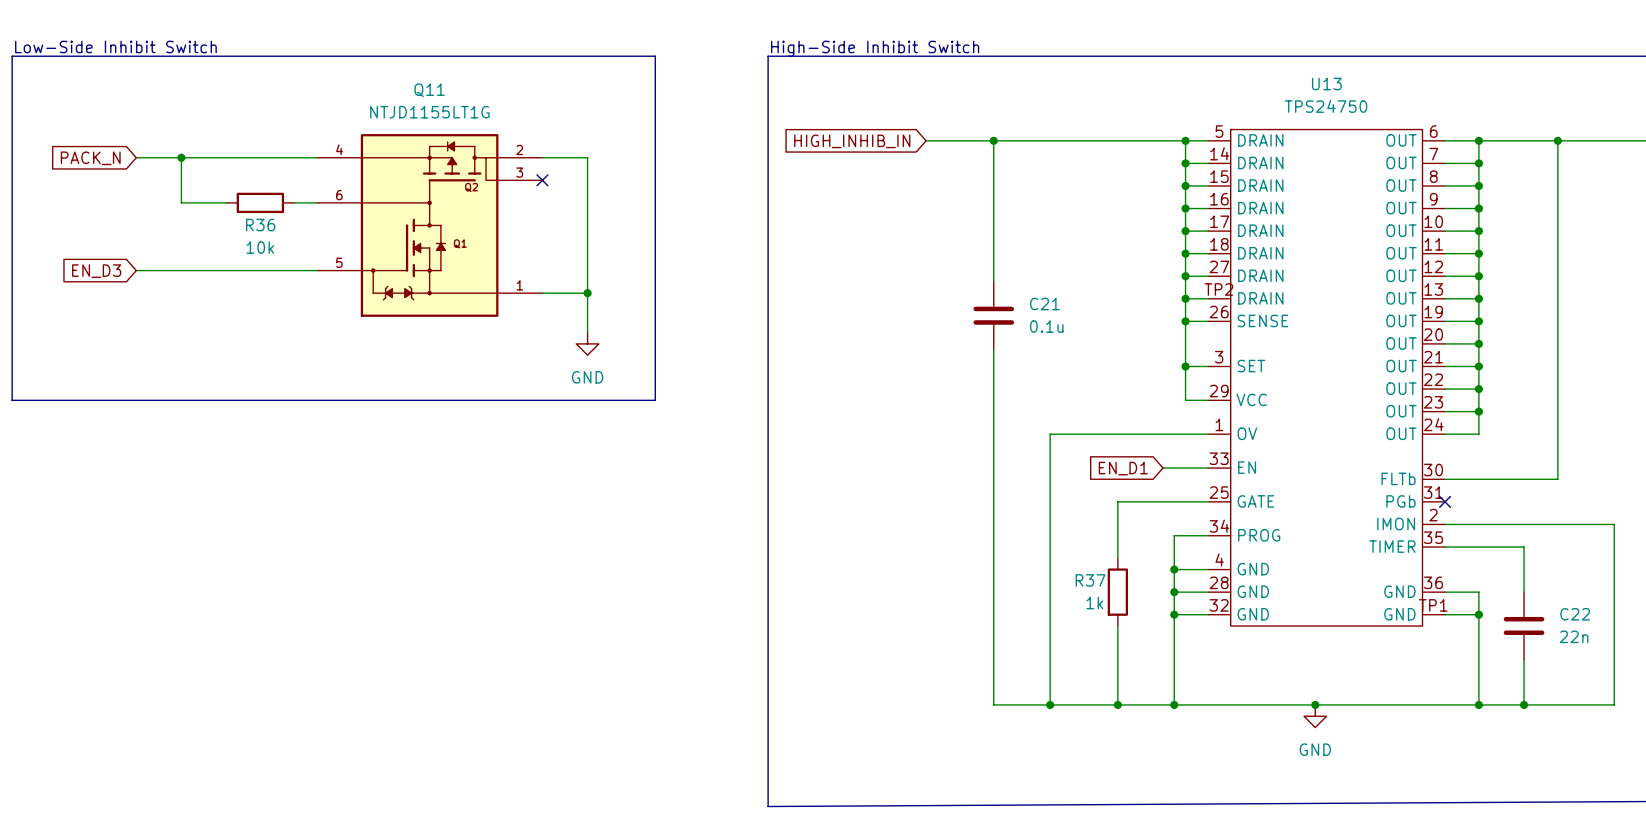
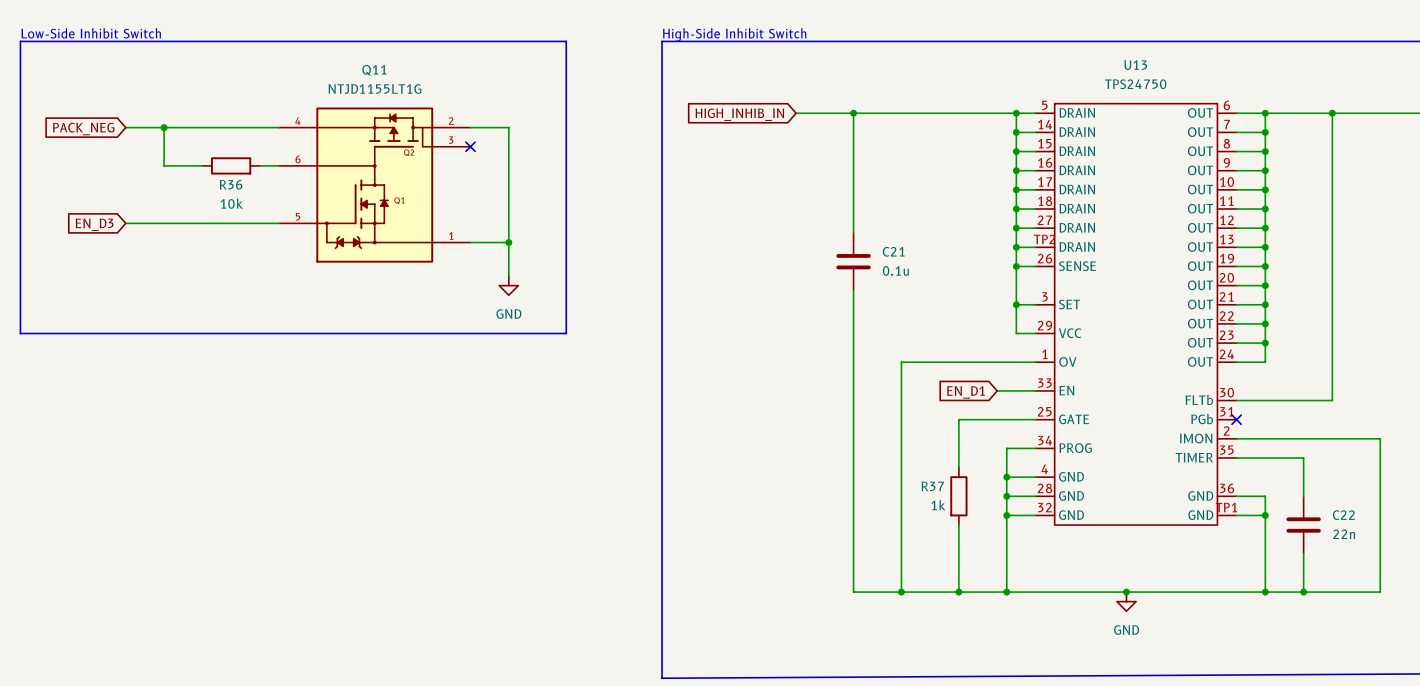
global label: PACK_N (90, 158) -> PACK_NEG (83, 129)

